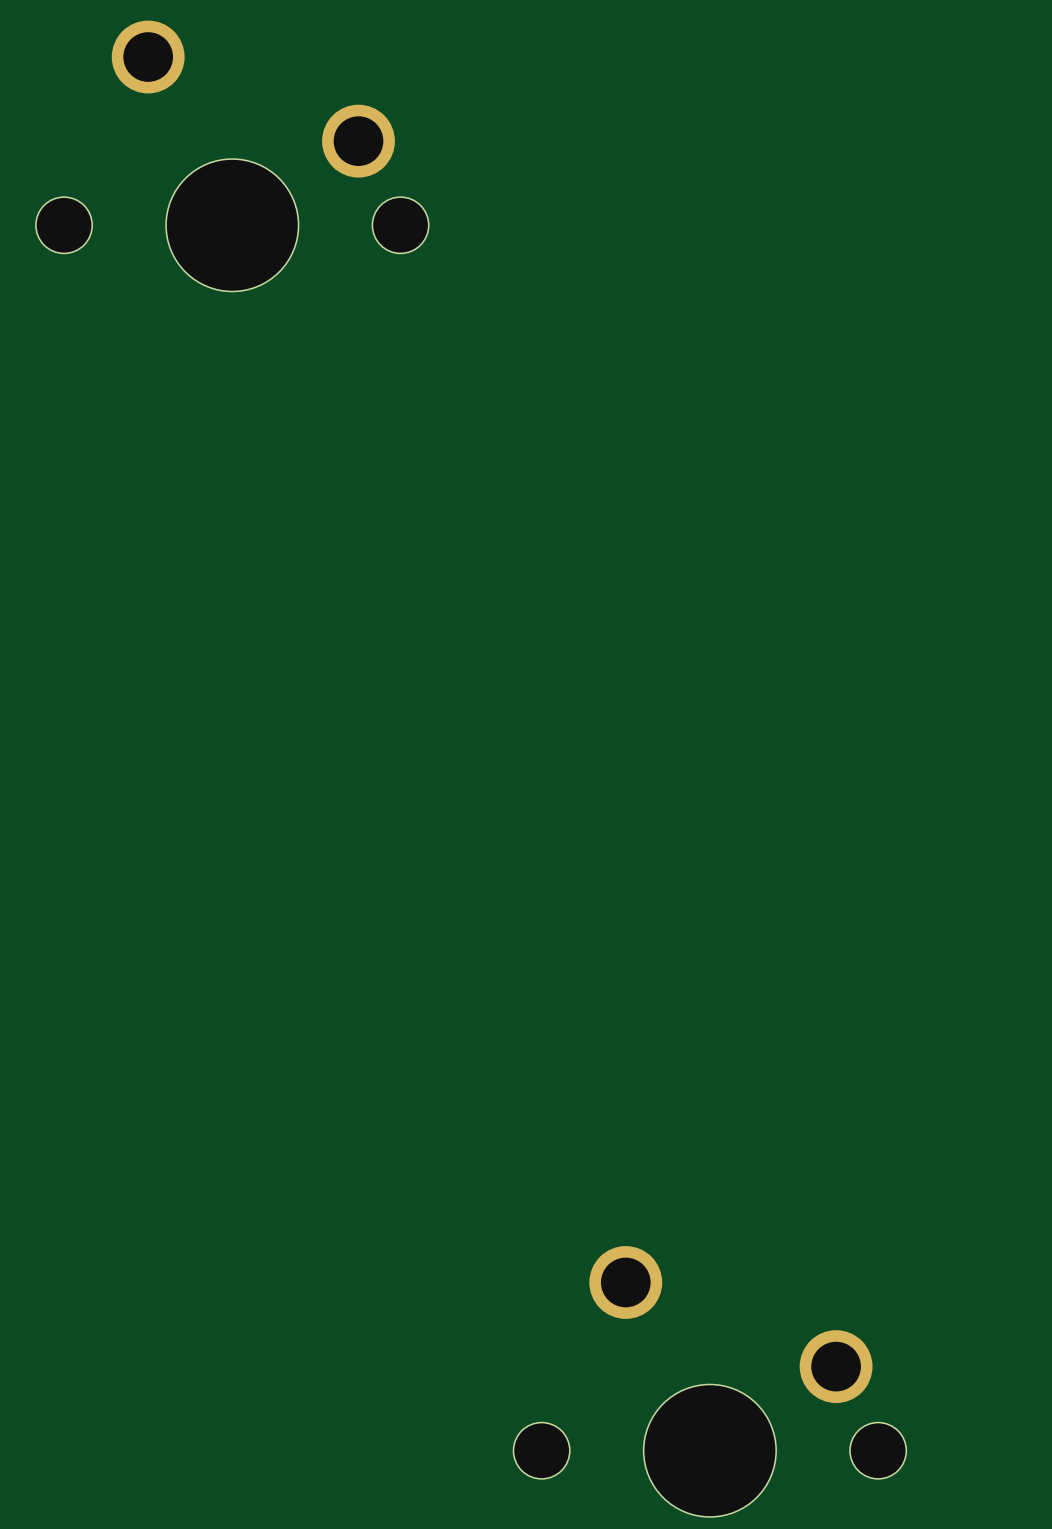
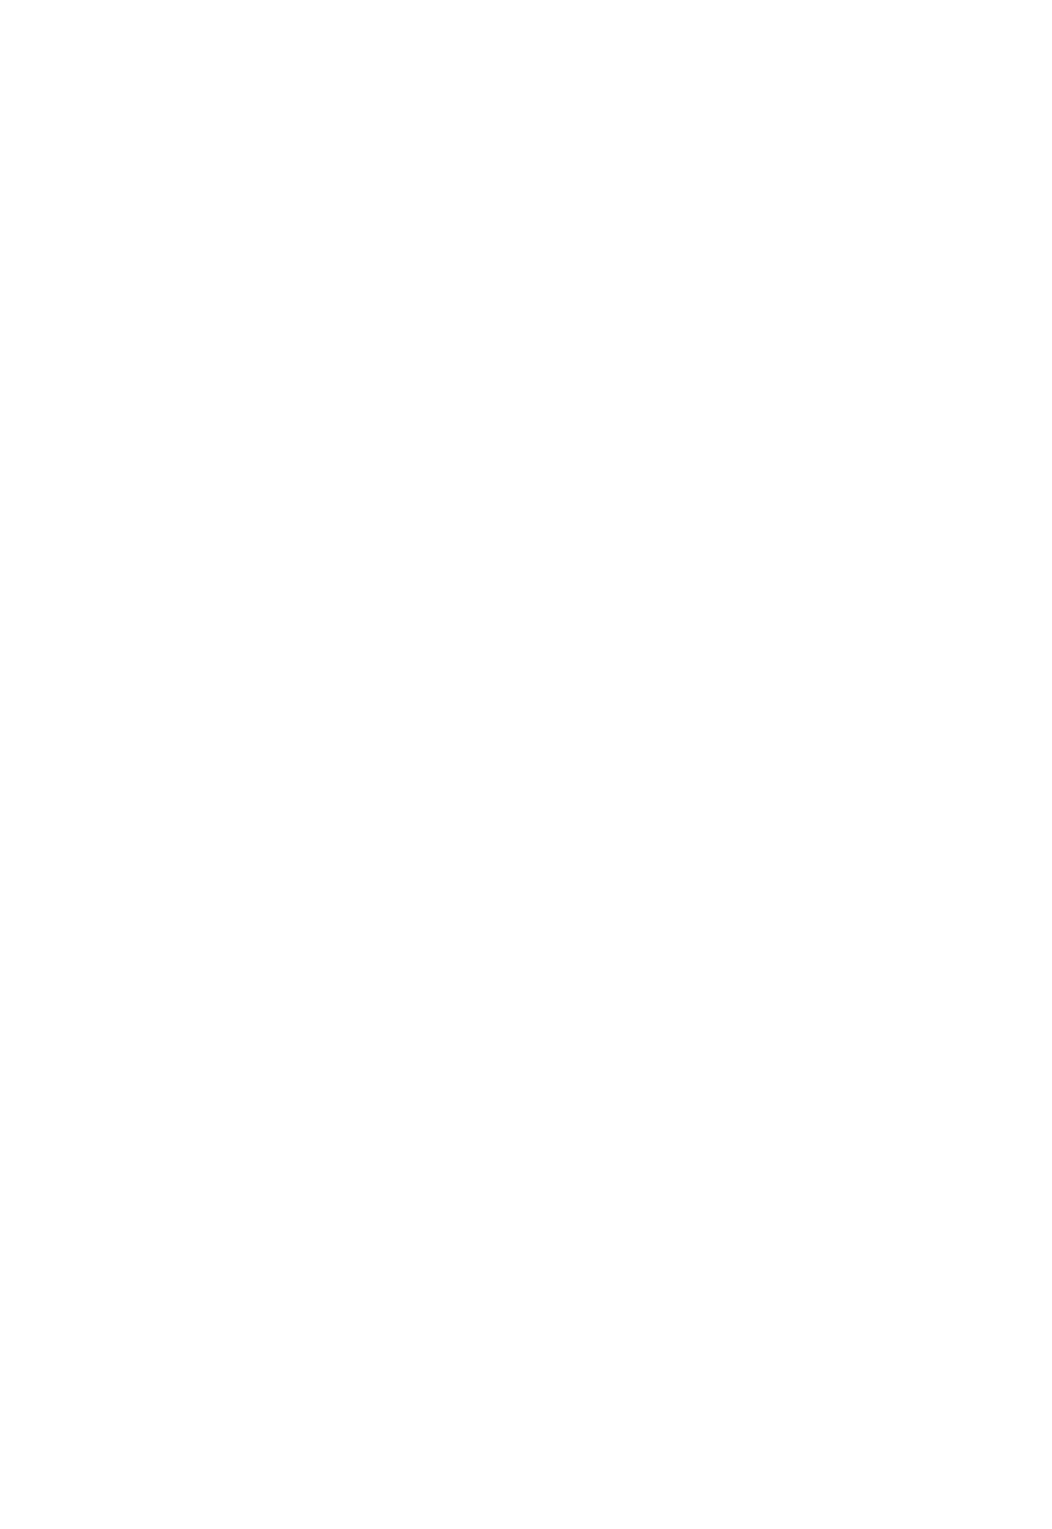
part: (232, 156) -> none
part: (709, 1381) -> none

